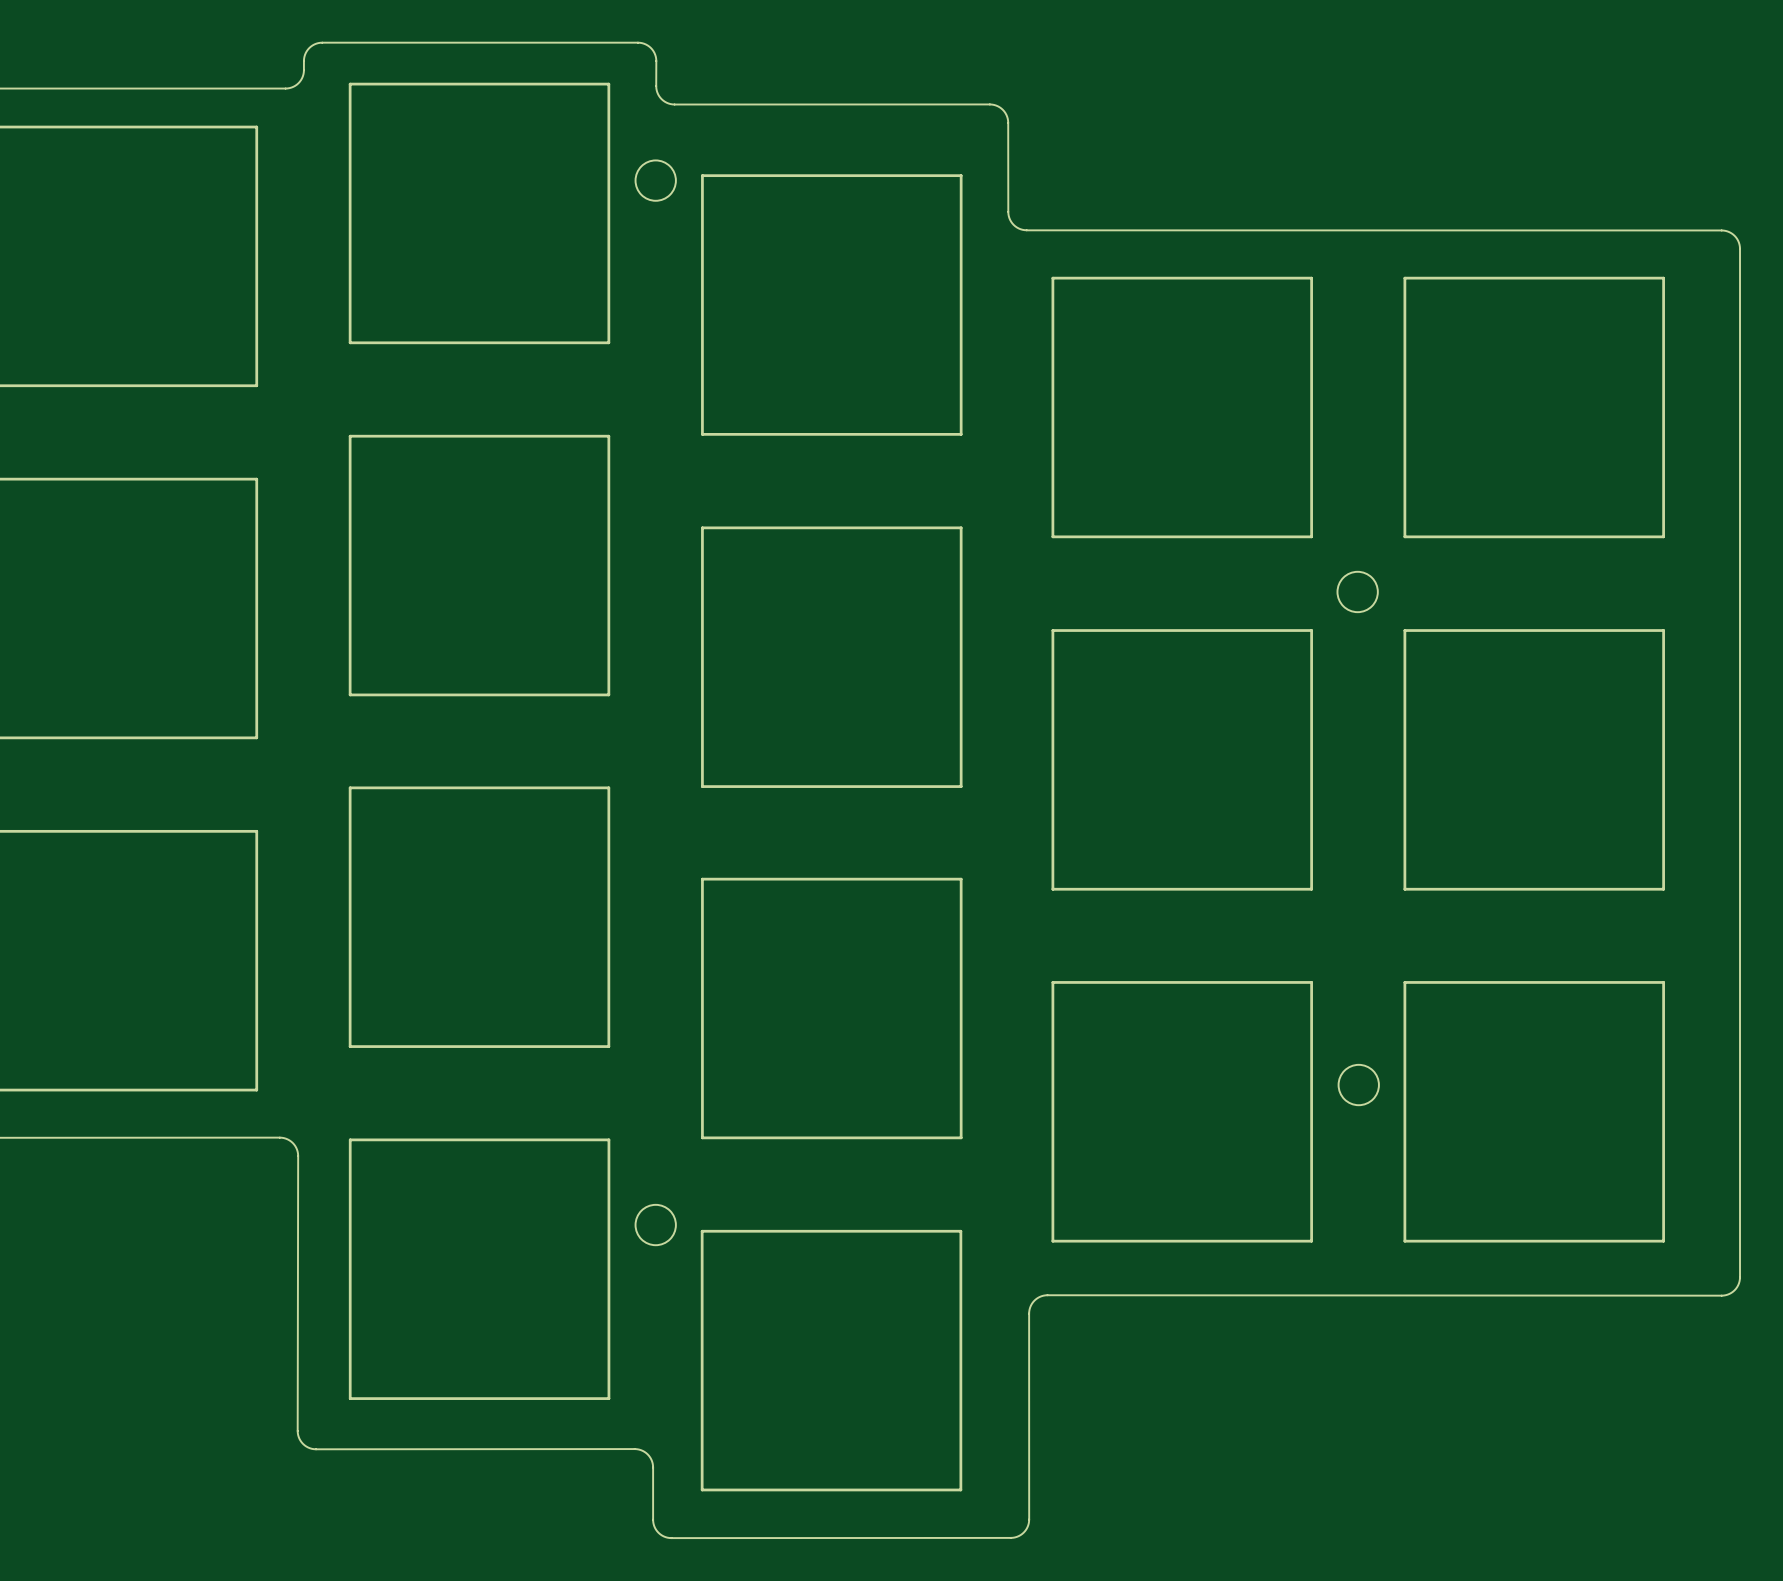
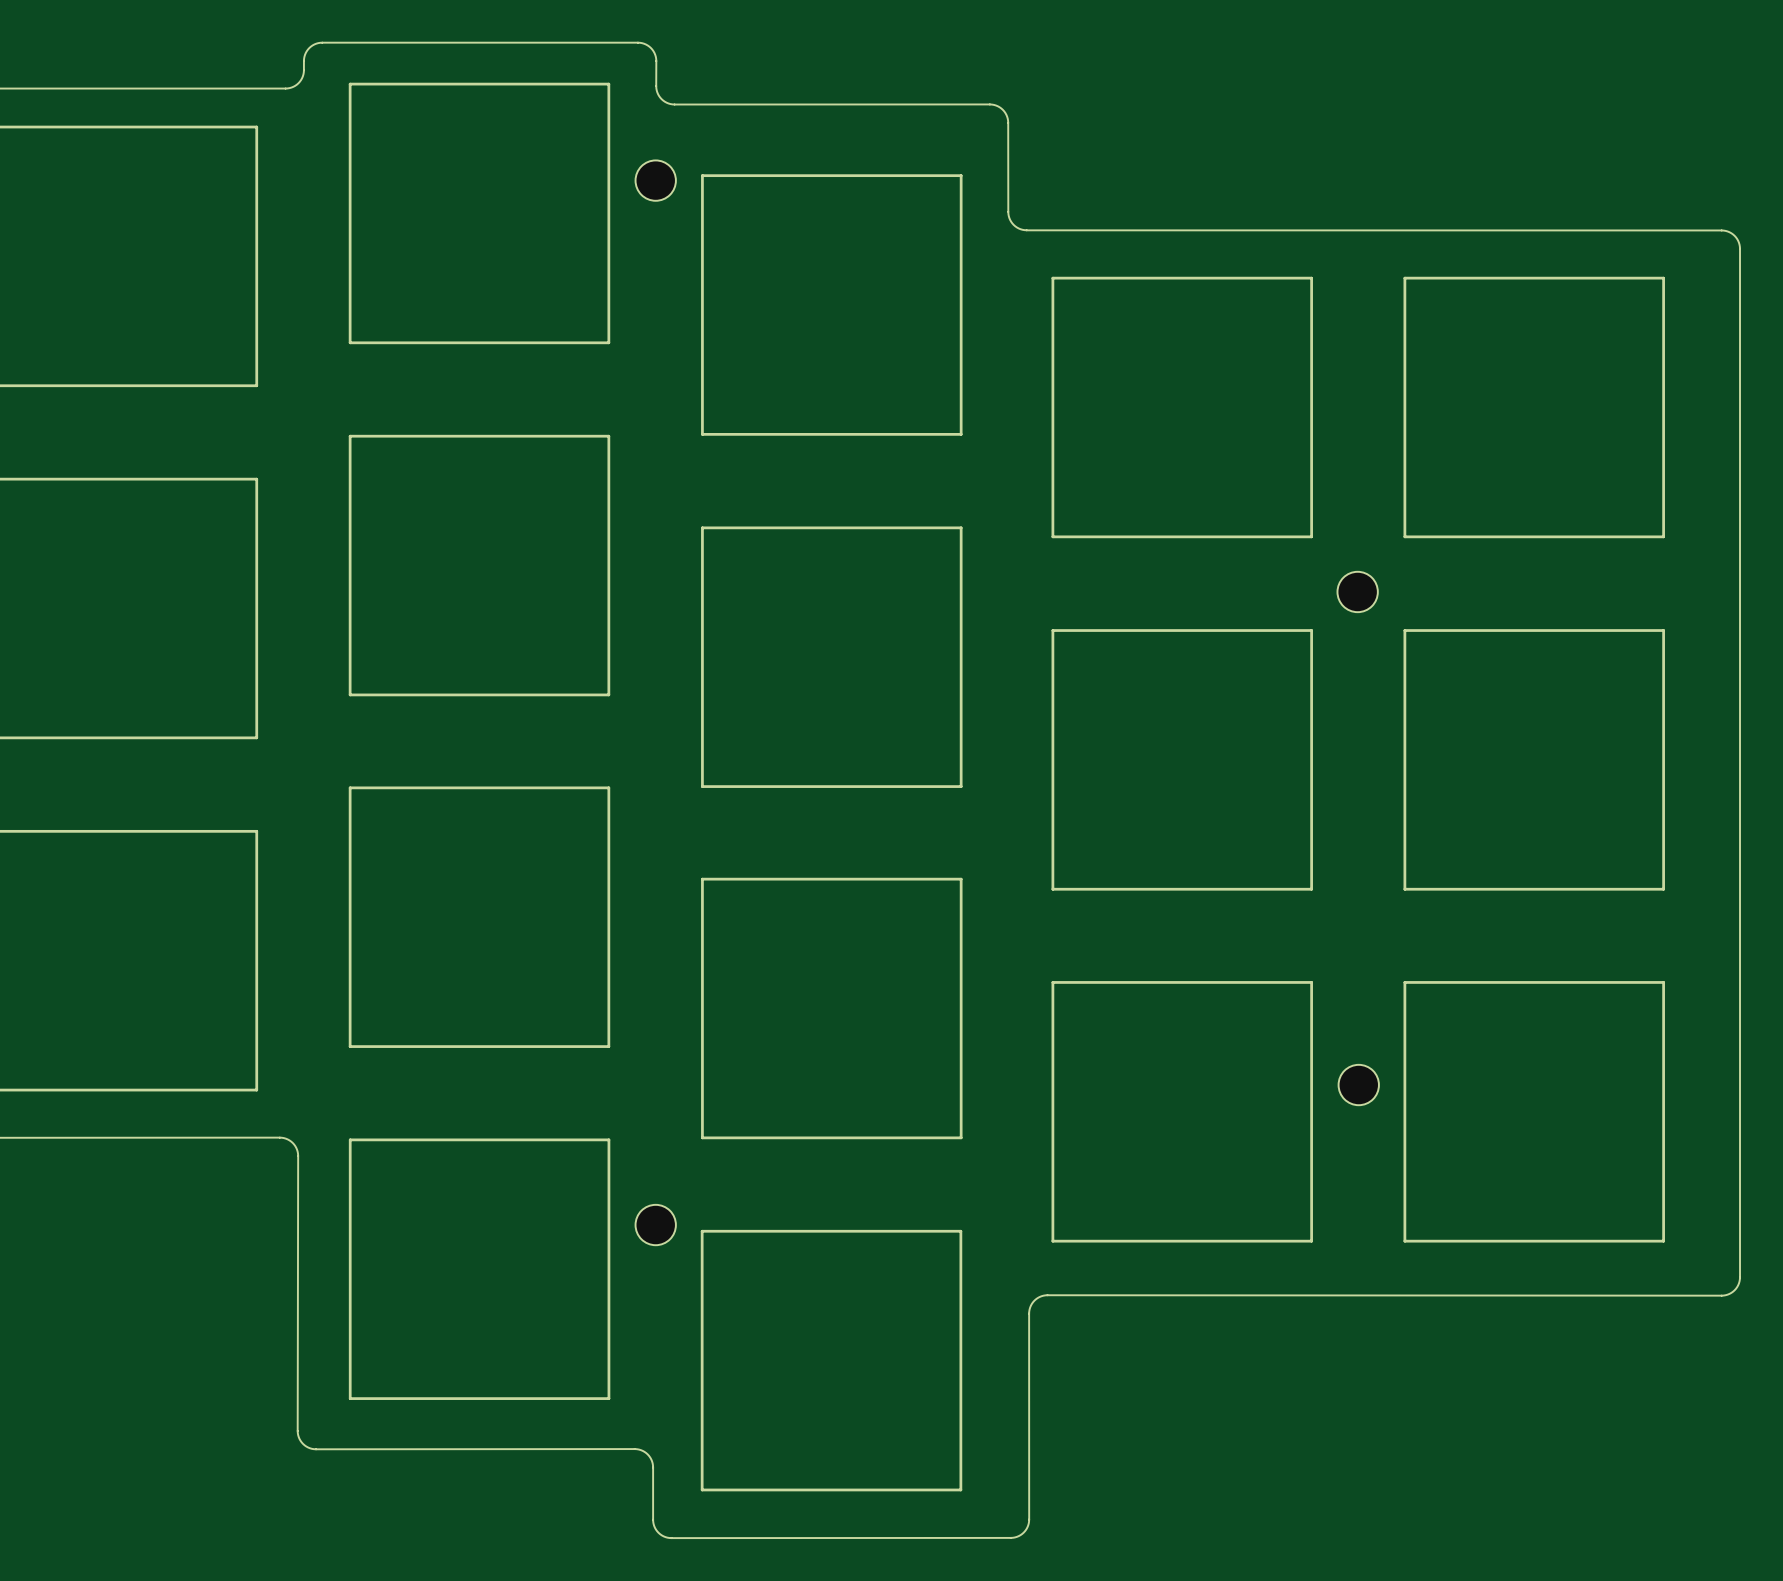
drawing: [635, 160, 677, 201] -> none
part: none -> (655, 180)
drawing: [1337, 571, 1378, 613] -> none
part: none -> (1357, 591)
drawing: [1338, 1064, 1380, 1106] -> none
part: none -> (1358, 1085)
drawing: [635, 1204, 677, 1246] -> none
part: none -> (655, 1225)

